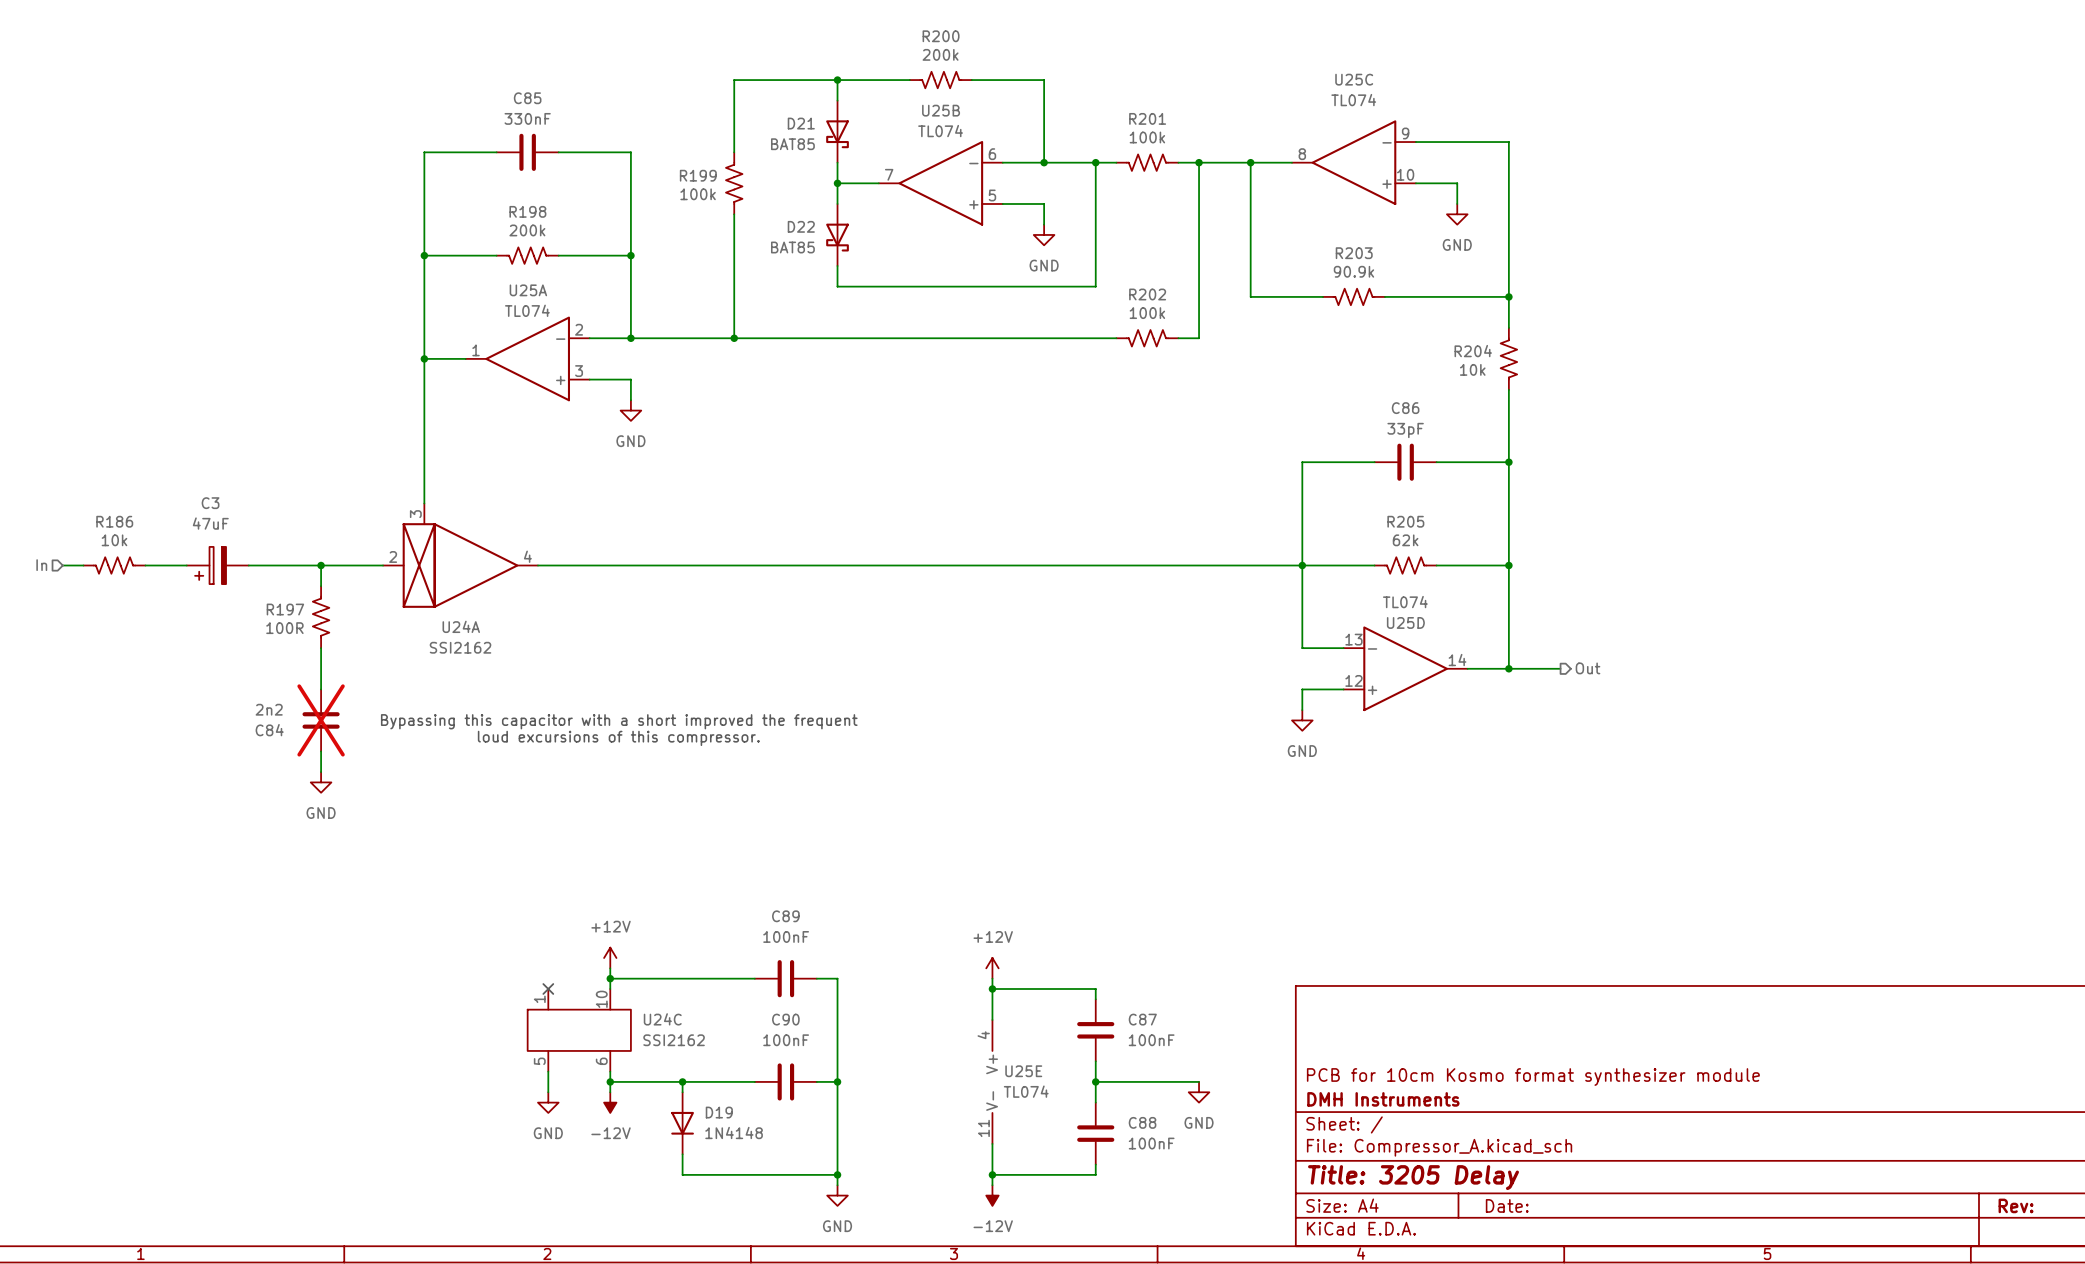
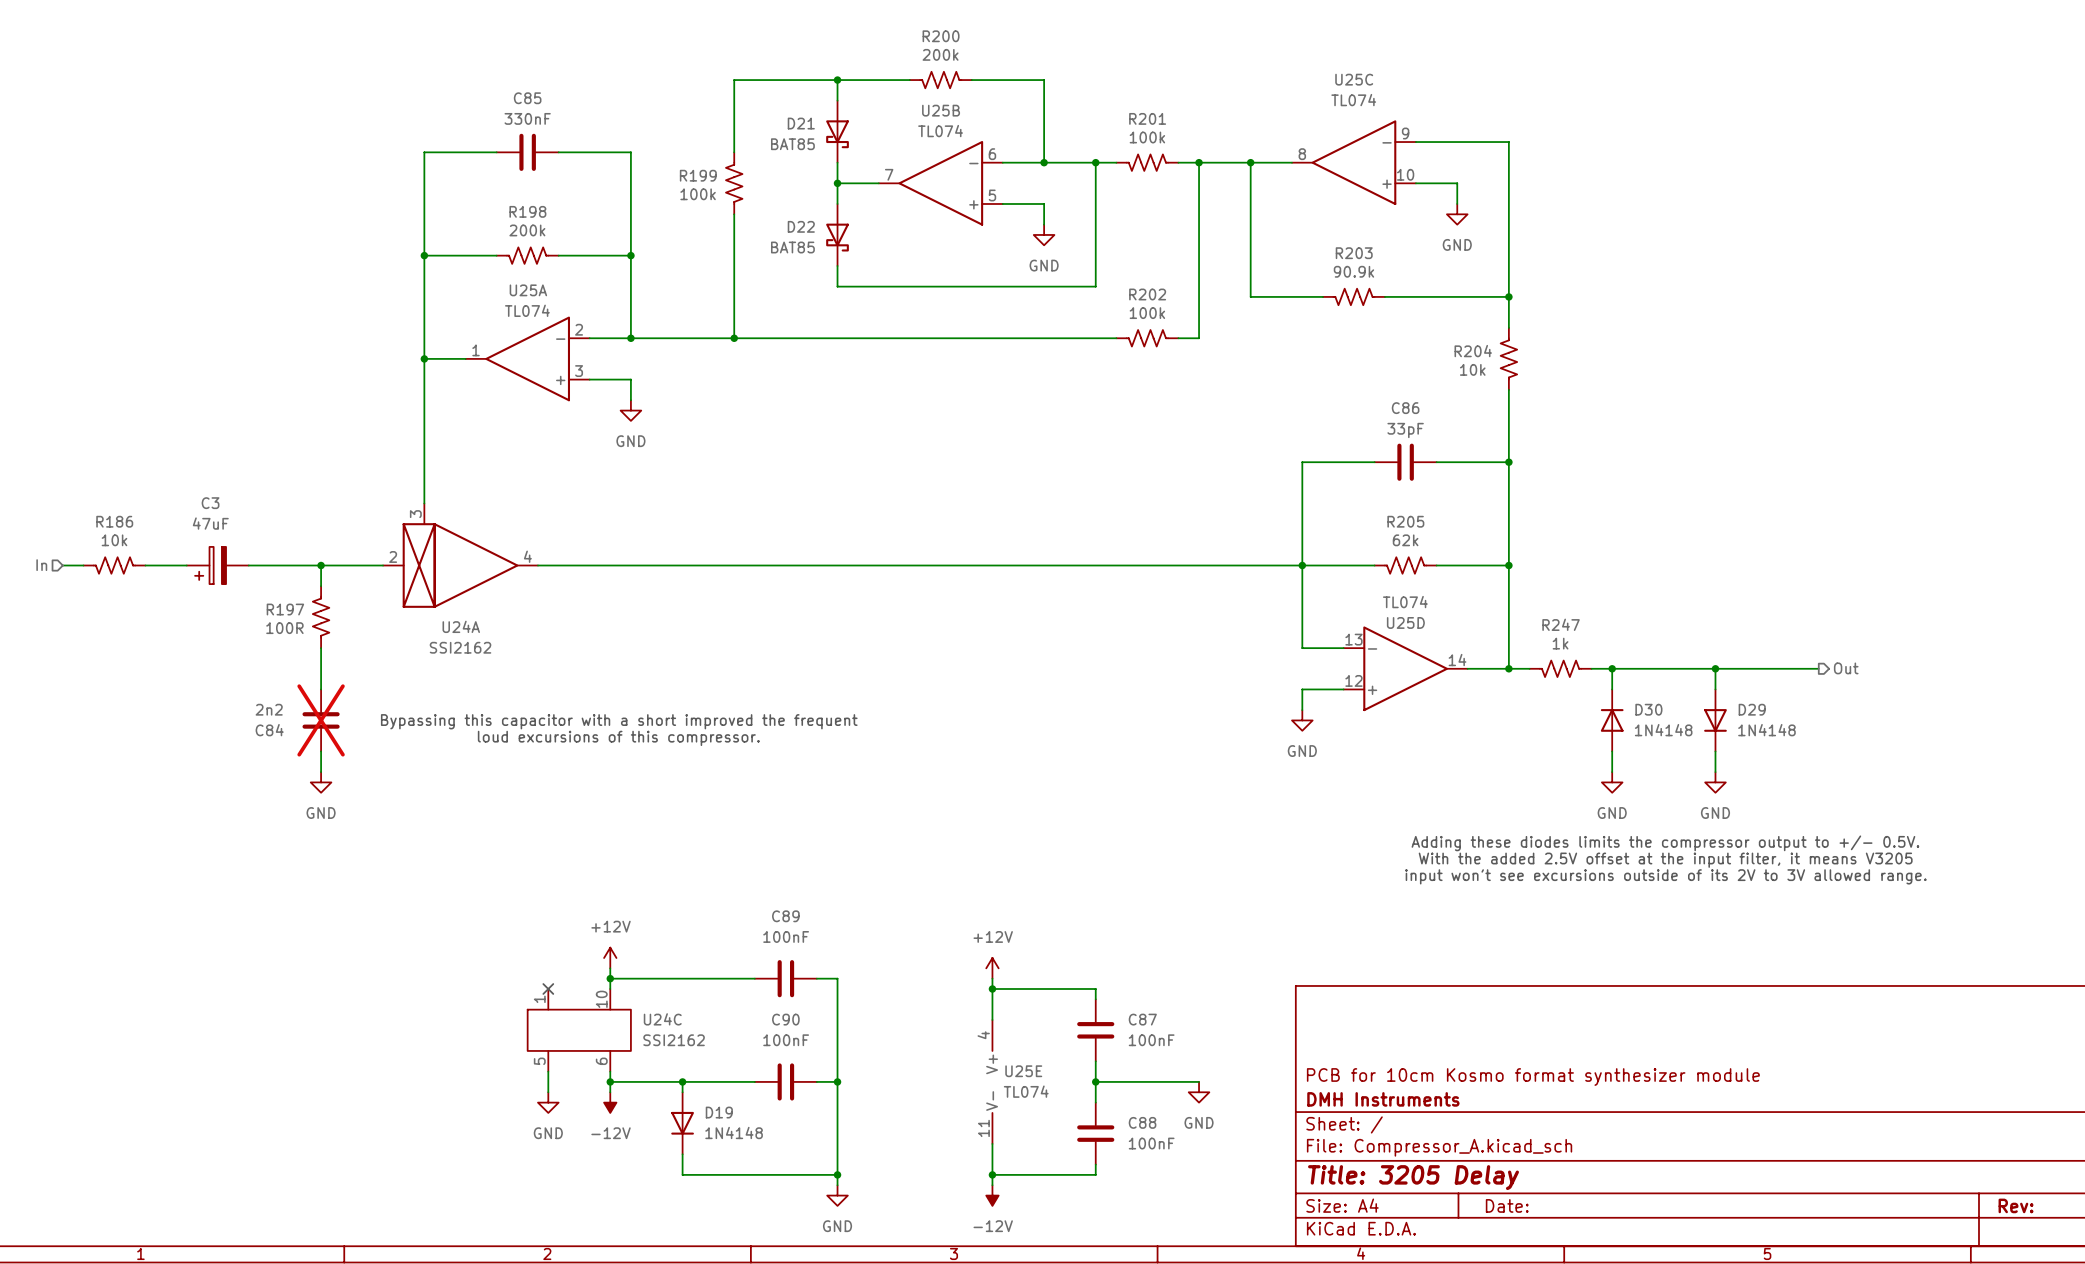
R247: none -> 1k (1560, 668)
hierarchical label: Out (1588, 668) -> none
wire: none -> (1591, 668) (1818, 668)
wire: none -> (1612, 668) (1612, 689)
junction: none -> (1612, 668)
wire: none -> (1715, 668) (1715, 689)
junction: none -> (1715, 668)
hierarchical label: none -> Out (1846, 668)
D30: none -> 1N4148 (1612, 720)
D29: none -> 1N4148 (1715, 720)
wire: none -> (1612, 751) (1612, 772)
wire: none -> (1715, 751) (1715, 772)
power symbol: none -> GND (1612, 782)
power symbol: none -> GND (1715, 782)
text: none -> Adding these diodes limits the compressor output to +/- 0.5V. (1665, 843)
text: none -> With the added 2.5V offset at the input filter, it means V3205 (1665, 860)
text: none -> input won't see excursions outside of its 2V to 3V allowed range. (1665, 876)

